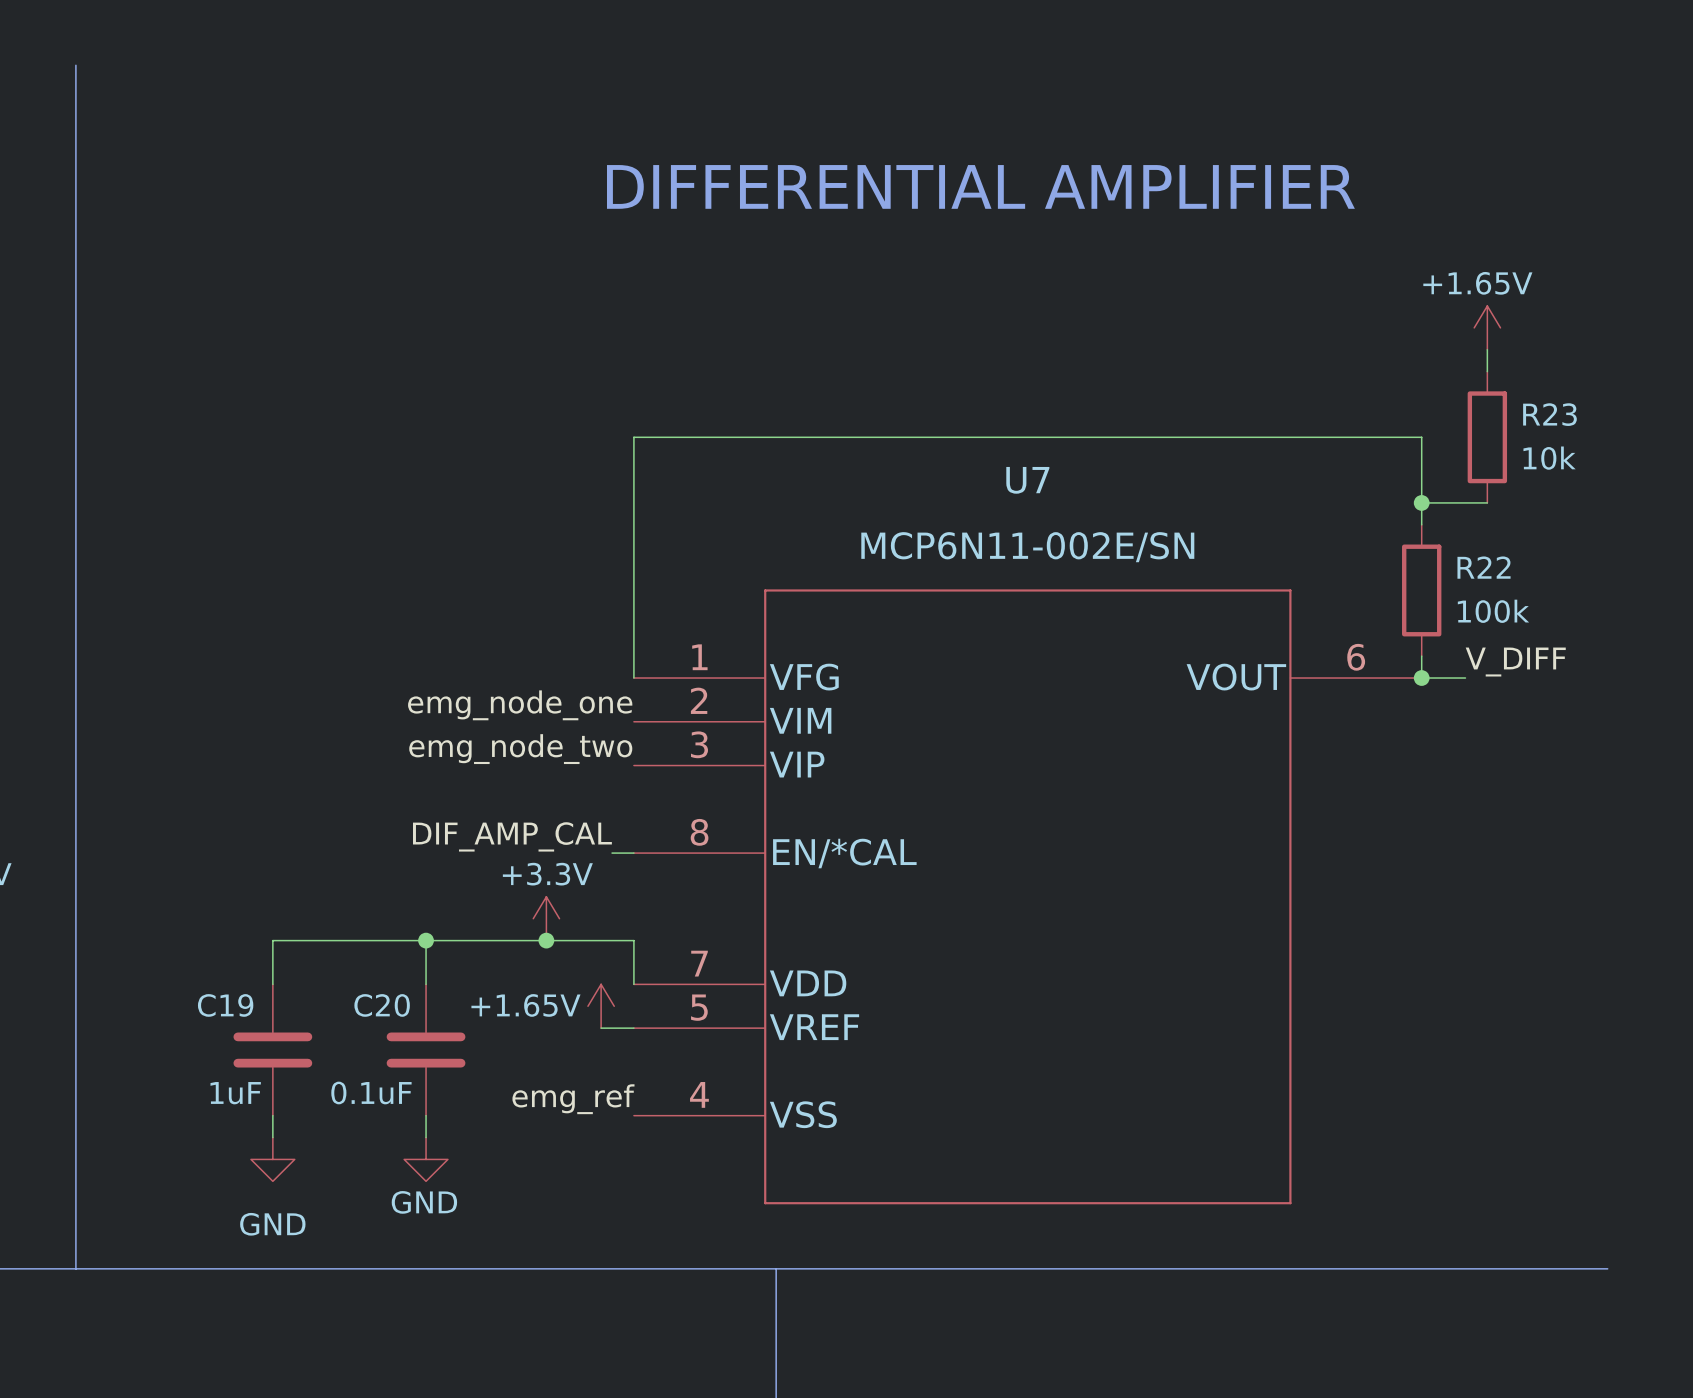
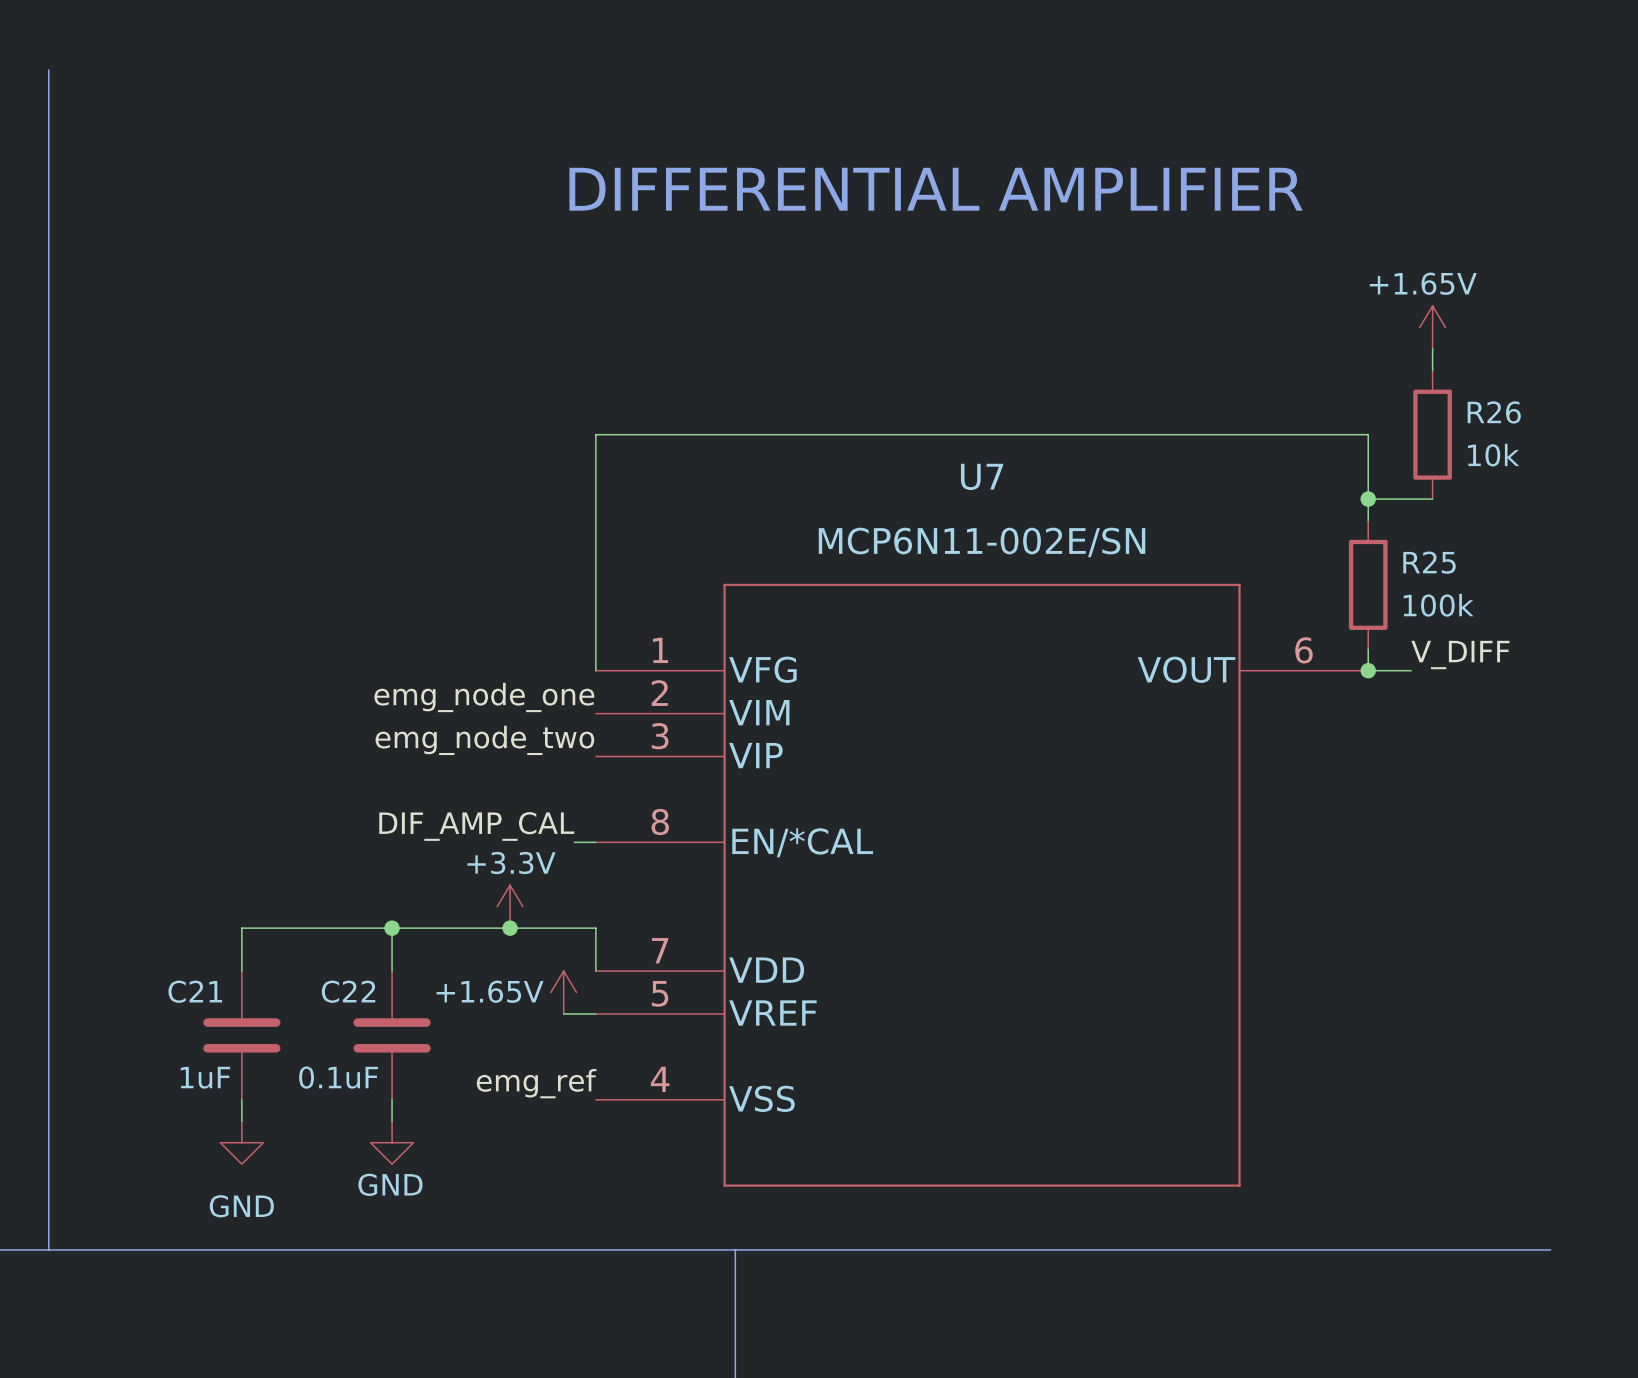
R23 name: R23 (1549, 414) -> R26 (1494, 412)
R22 name: R22 (1484, 567) -> R25 (1429, 562)
C19 name: C19 (225, 1005) -> C21 (195, 991)
C20 name: C20 (382, 1005) -> C22 (348, 991)

